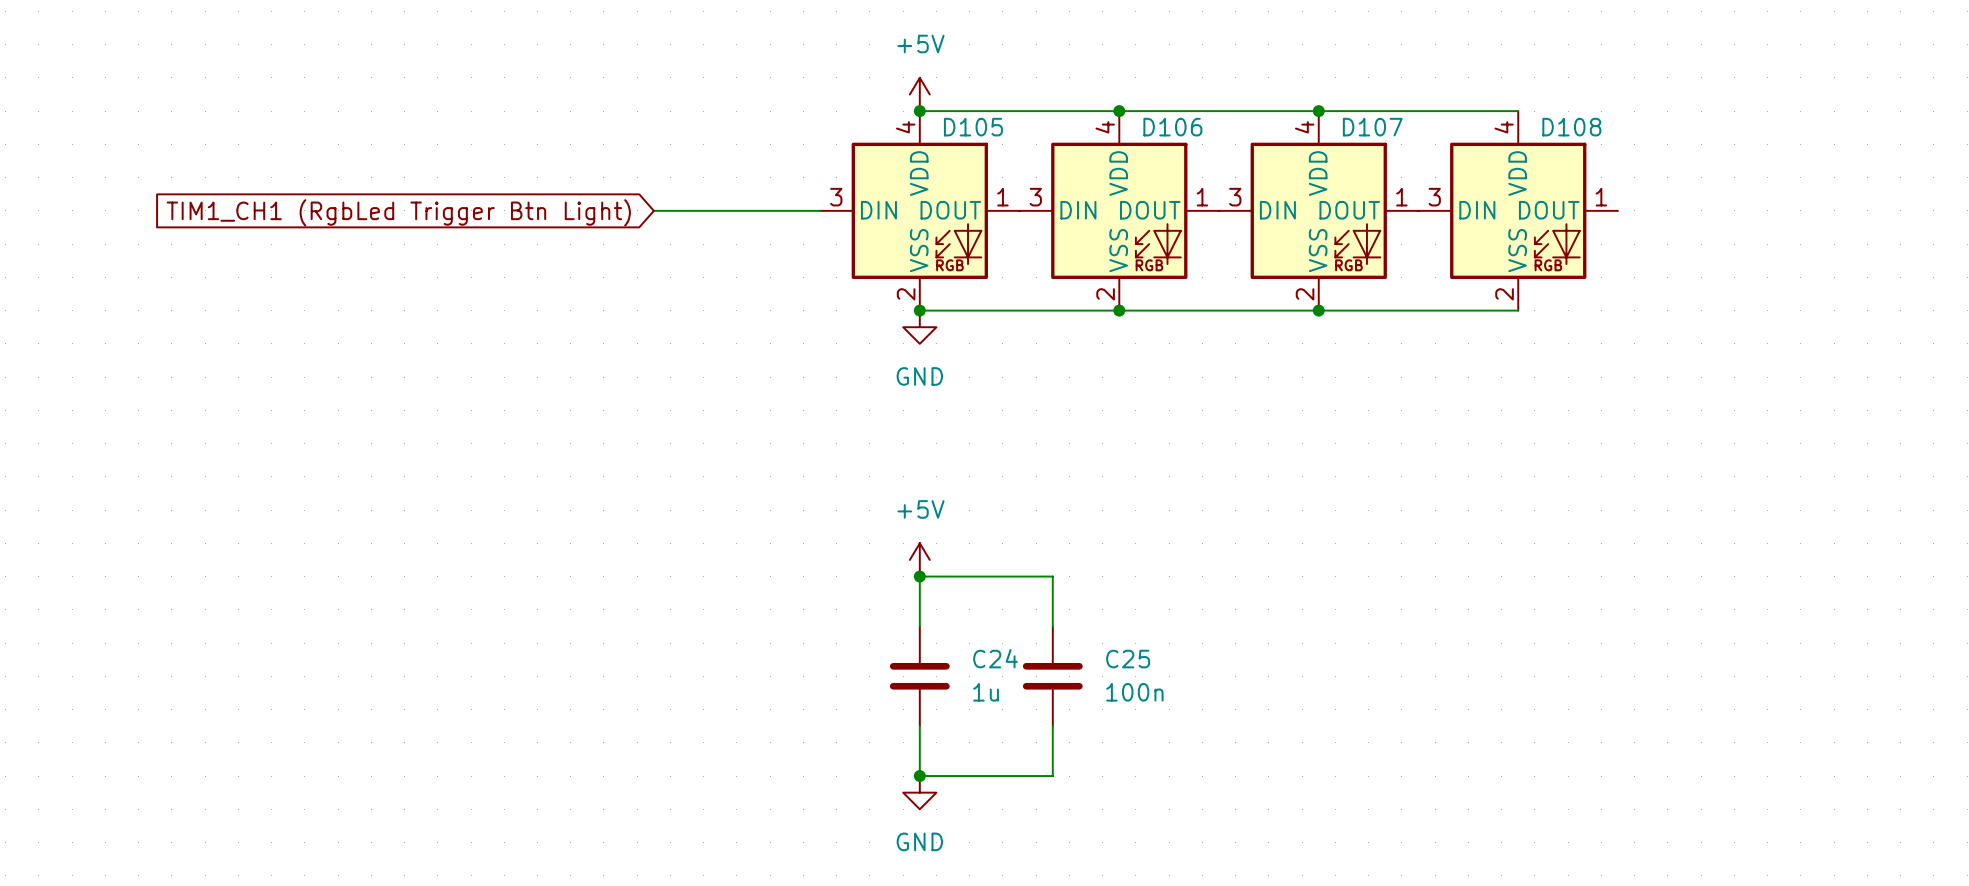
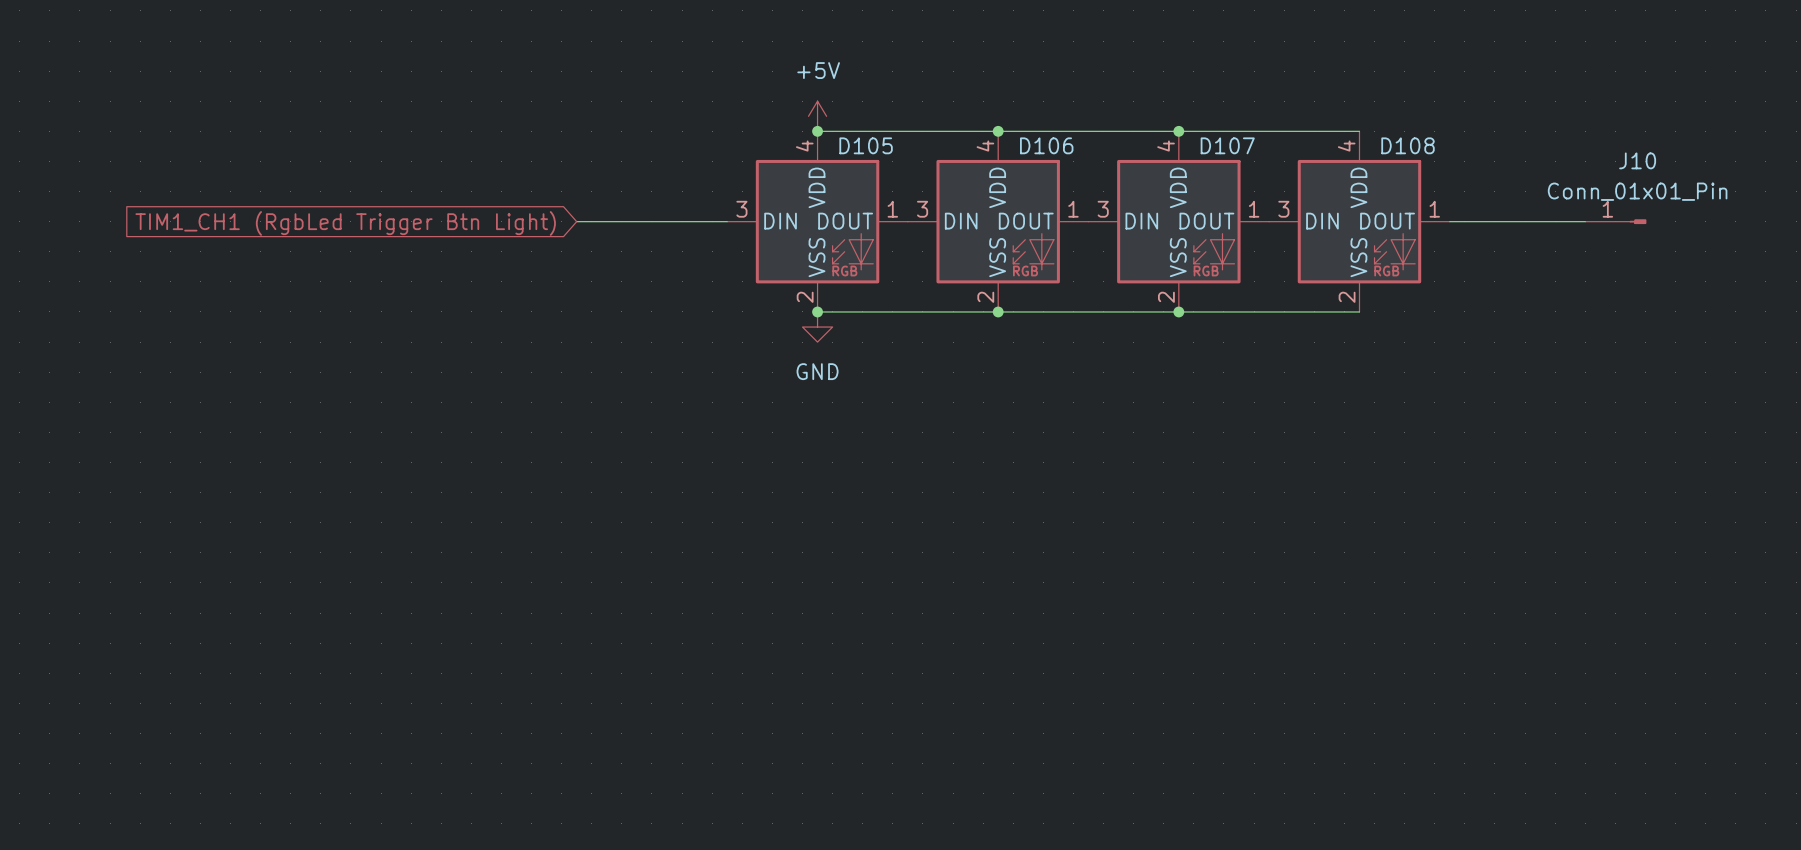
wire: none -> (1449, 221) (1585, 221)
J10: none -> Conn_01x01_Pin (1615, 221)
power symbol: +5V (919, 559) -> none
junction: (919, 576) -> none
wire: (919, 626) (919, 576) (1052, 576) (1052, 626) -> none
C24: 1u (919, 676) -> none
C25: 100n (1052, 676) -> none
wire: (919, 726) (919, 776) (1052, 776) (1052, 726) -> none
junction: (919, 776) -> none
power symbol: GND (919, 792) -> none

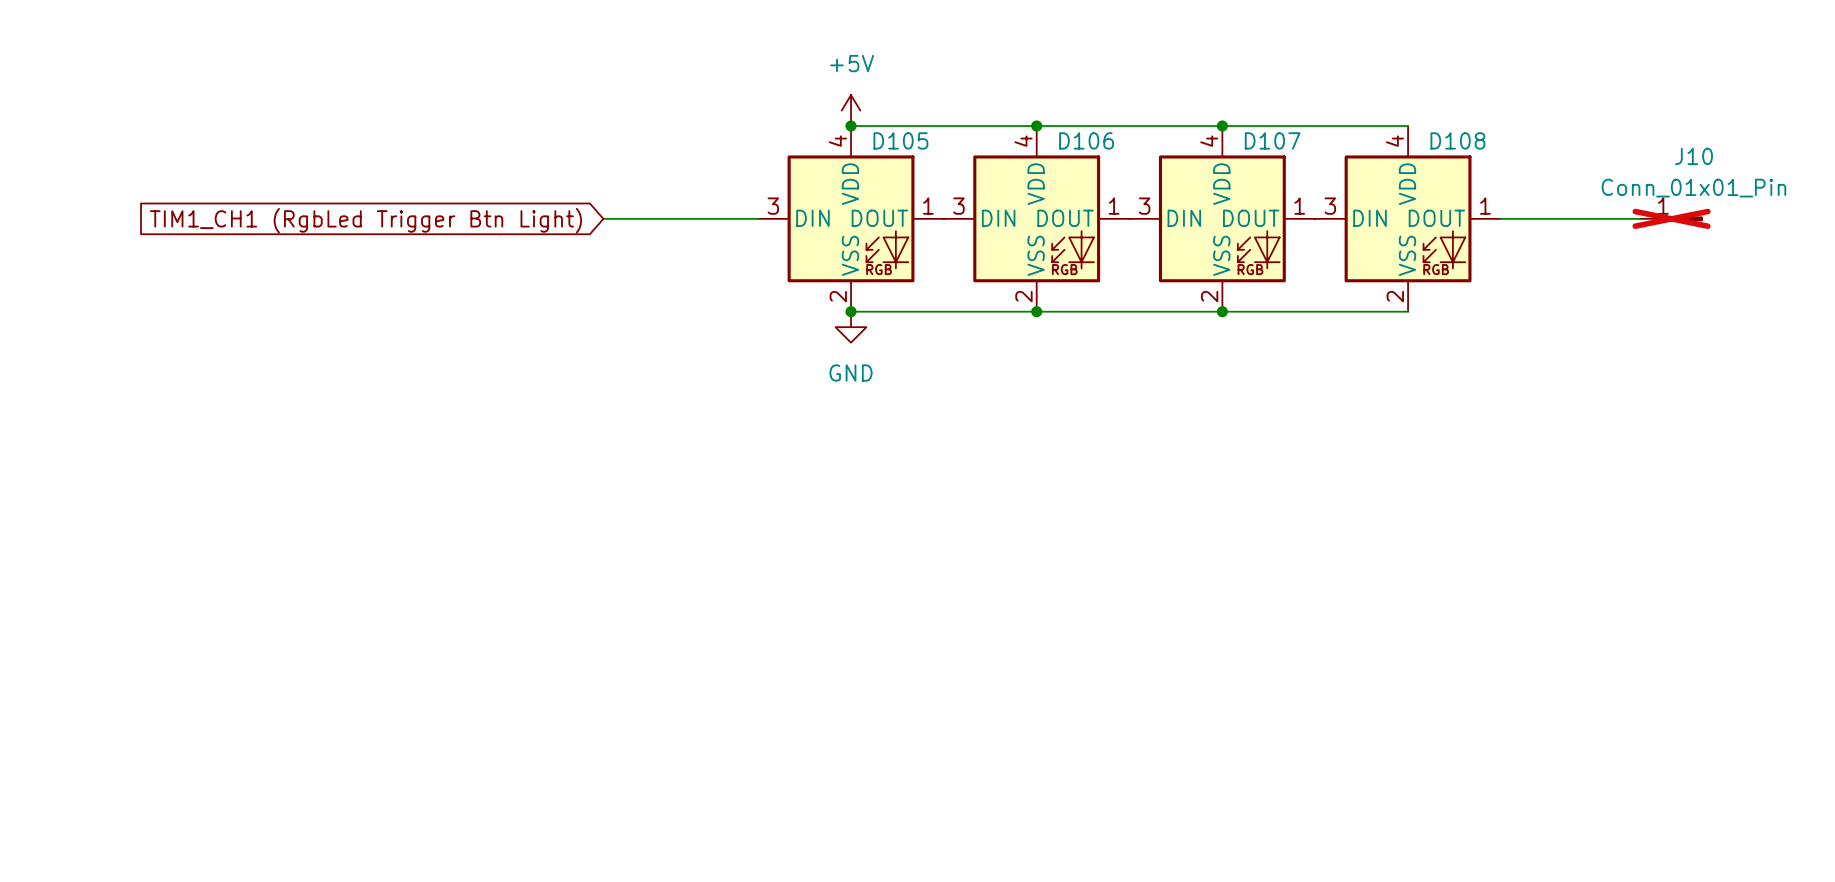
J10 do-not-place cross: none -> (1671, 218)

